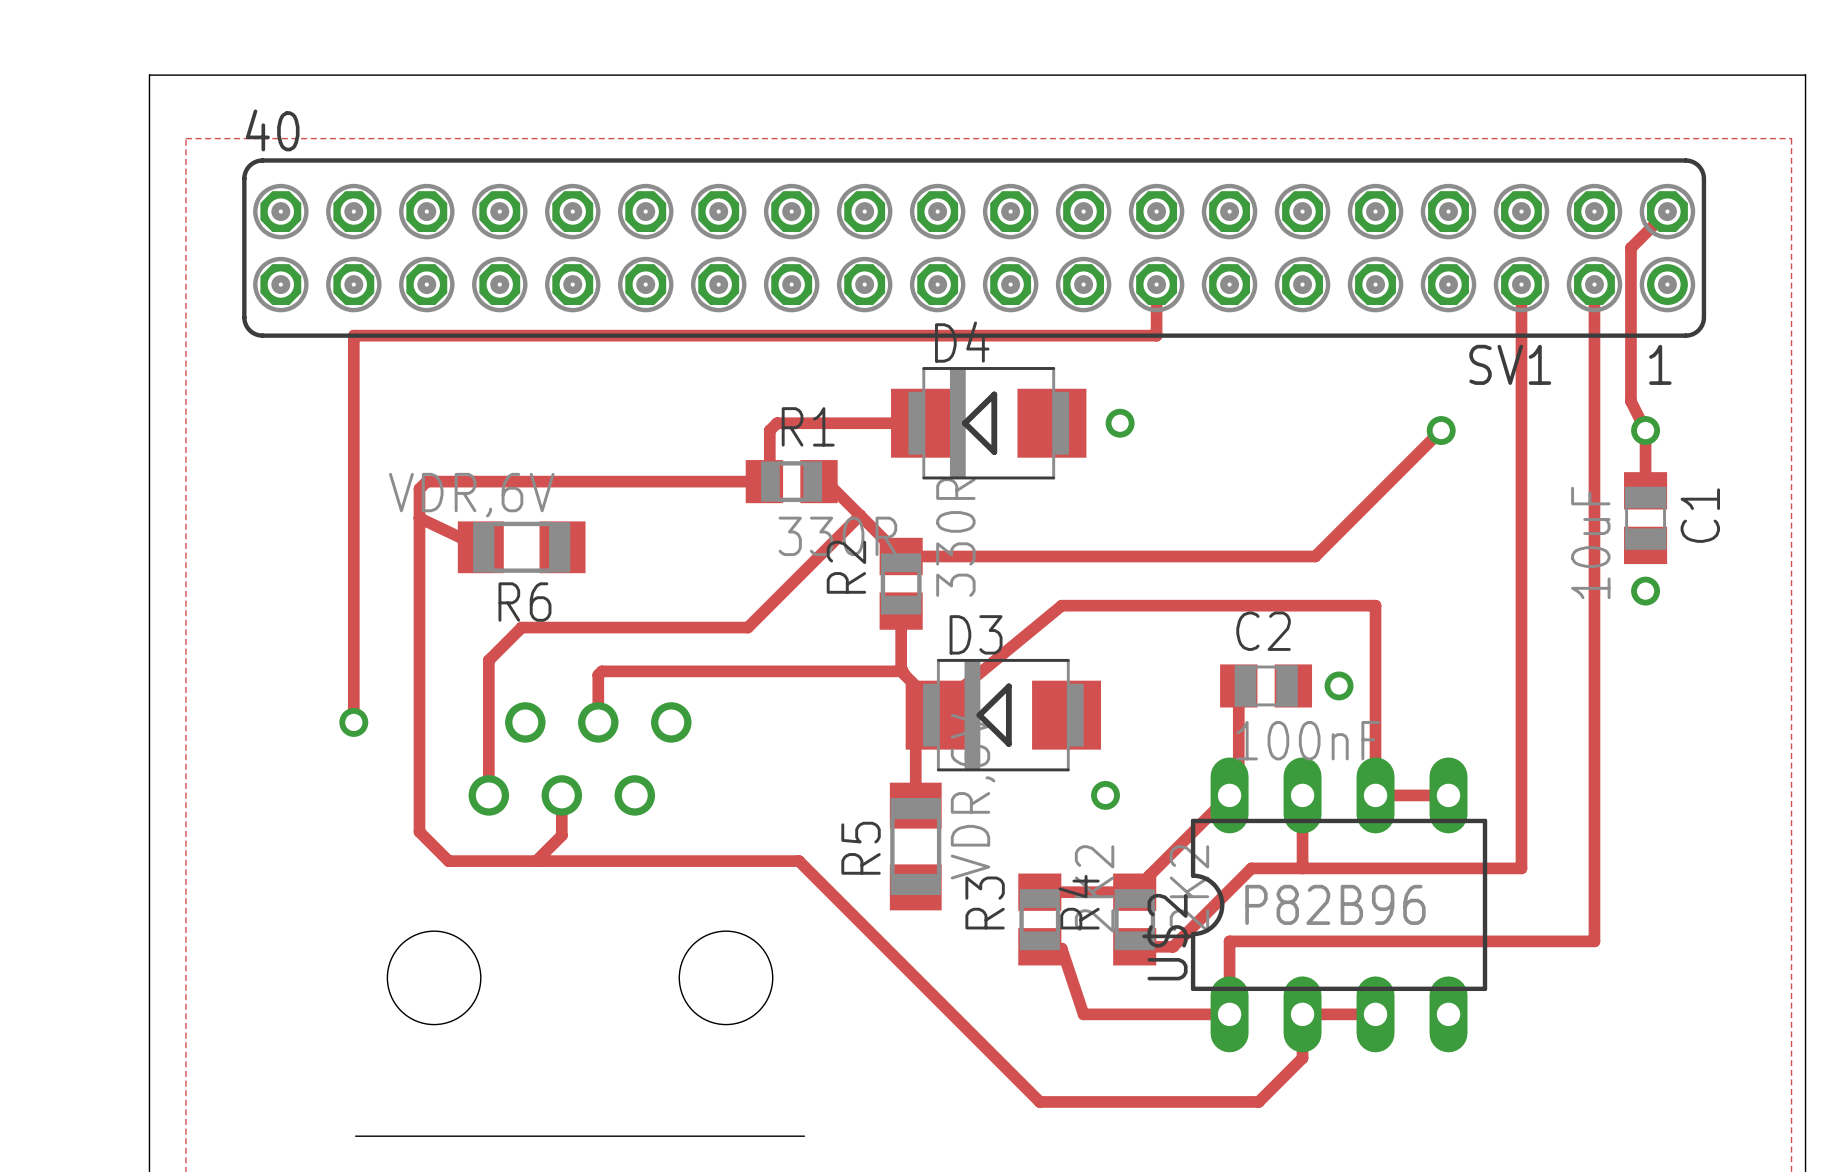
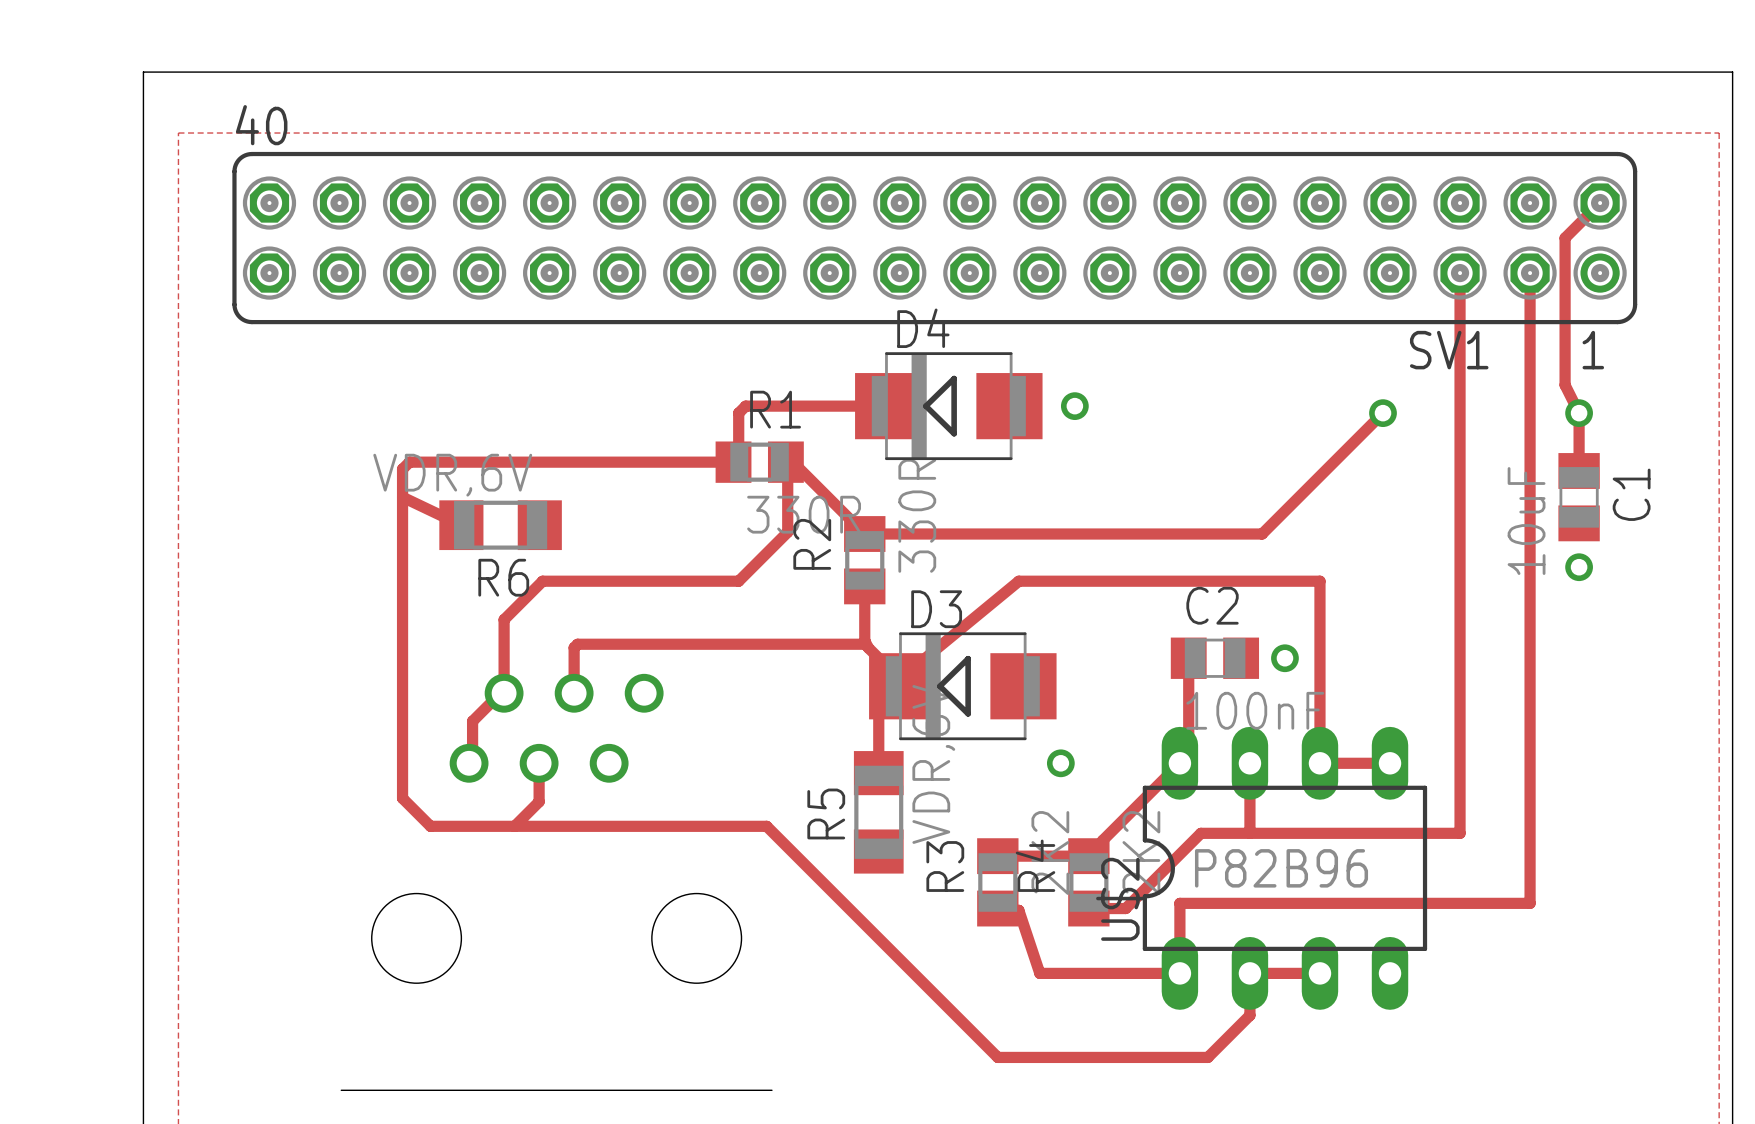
track: (1156, 284) (1156, 335) (353, 335) (353, 722) -> none
track: (860, 515) (820, 554) -> (785, 462) (787, 463) (787, 532)
track: (769, 605) (747, 627) (521, 627) (488, 660) (488, 795) -> (738, 581) (542, 581) (504, 619) (504, 693) (500, 693) (472, 721) (472, 759) (469, 763)
via: (353, 722) -> none

